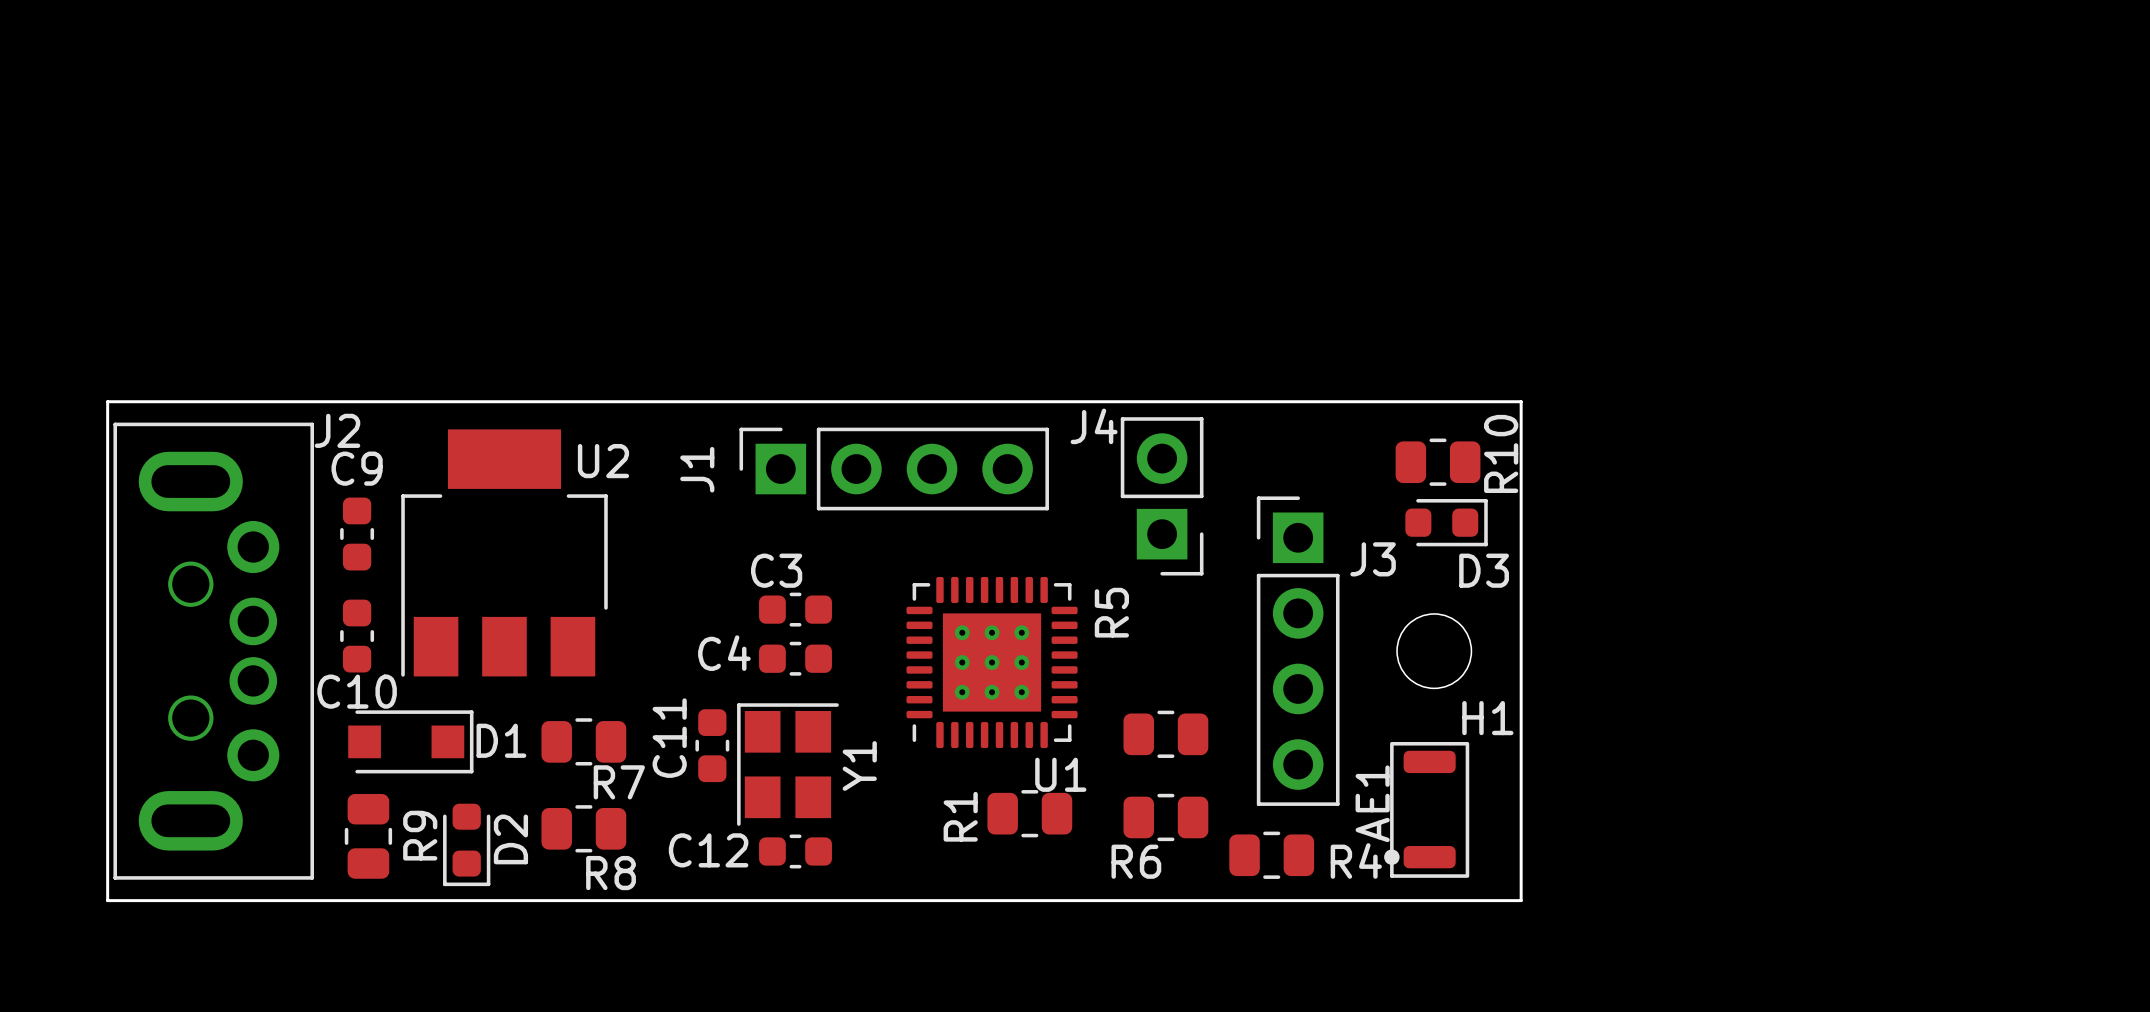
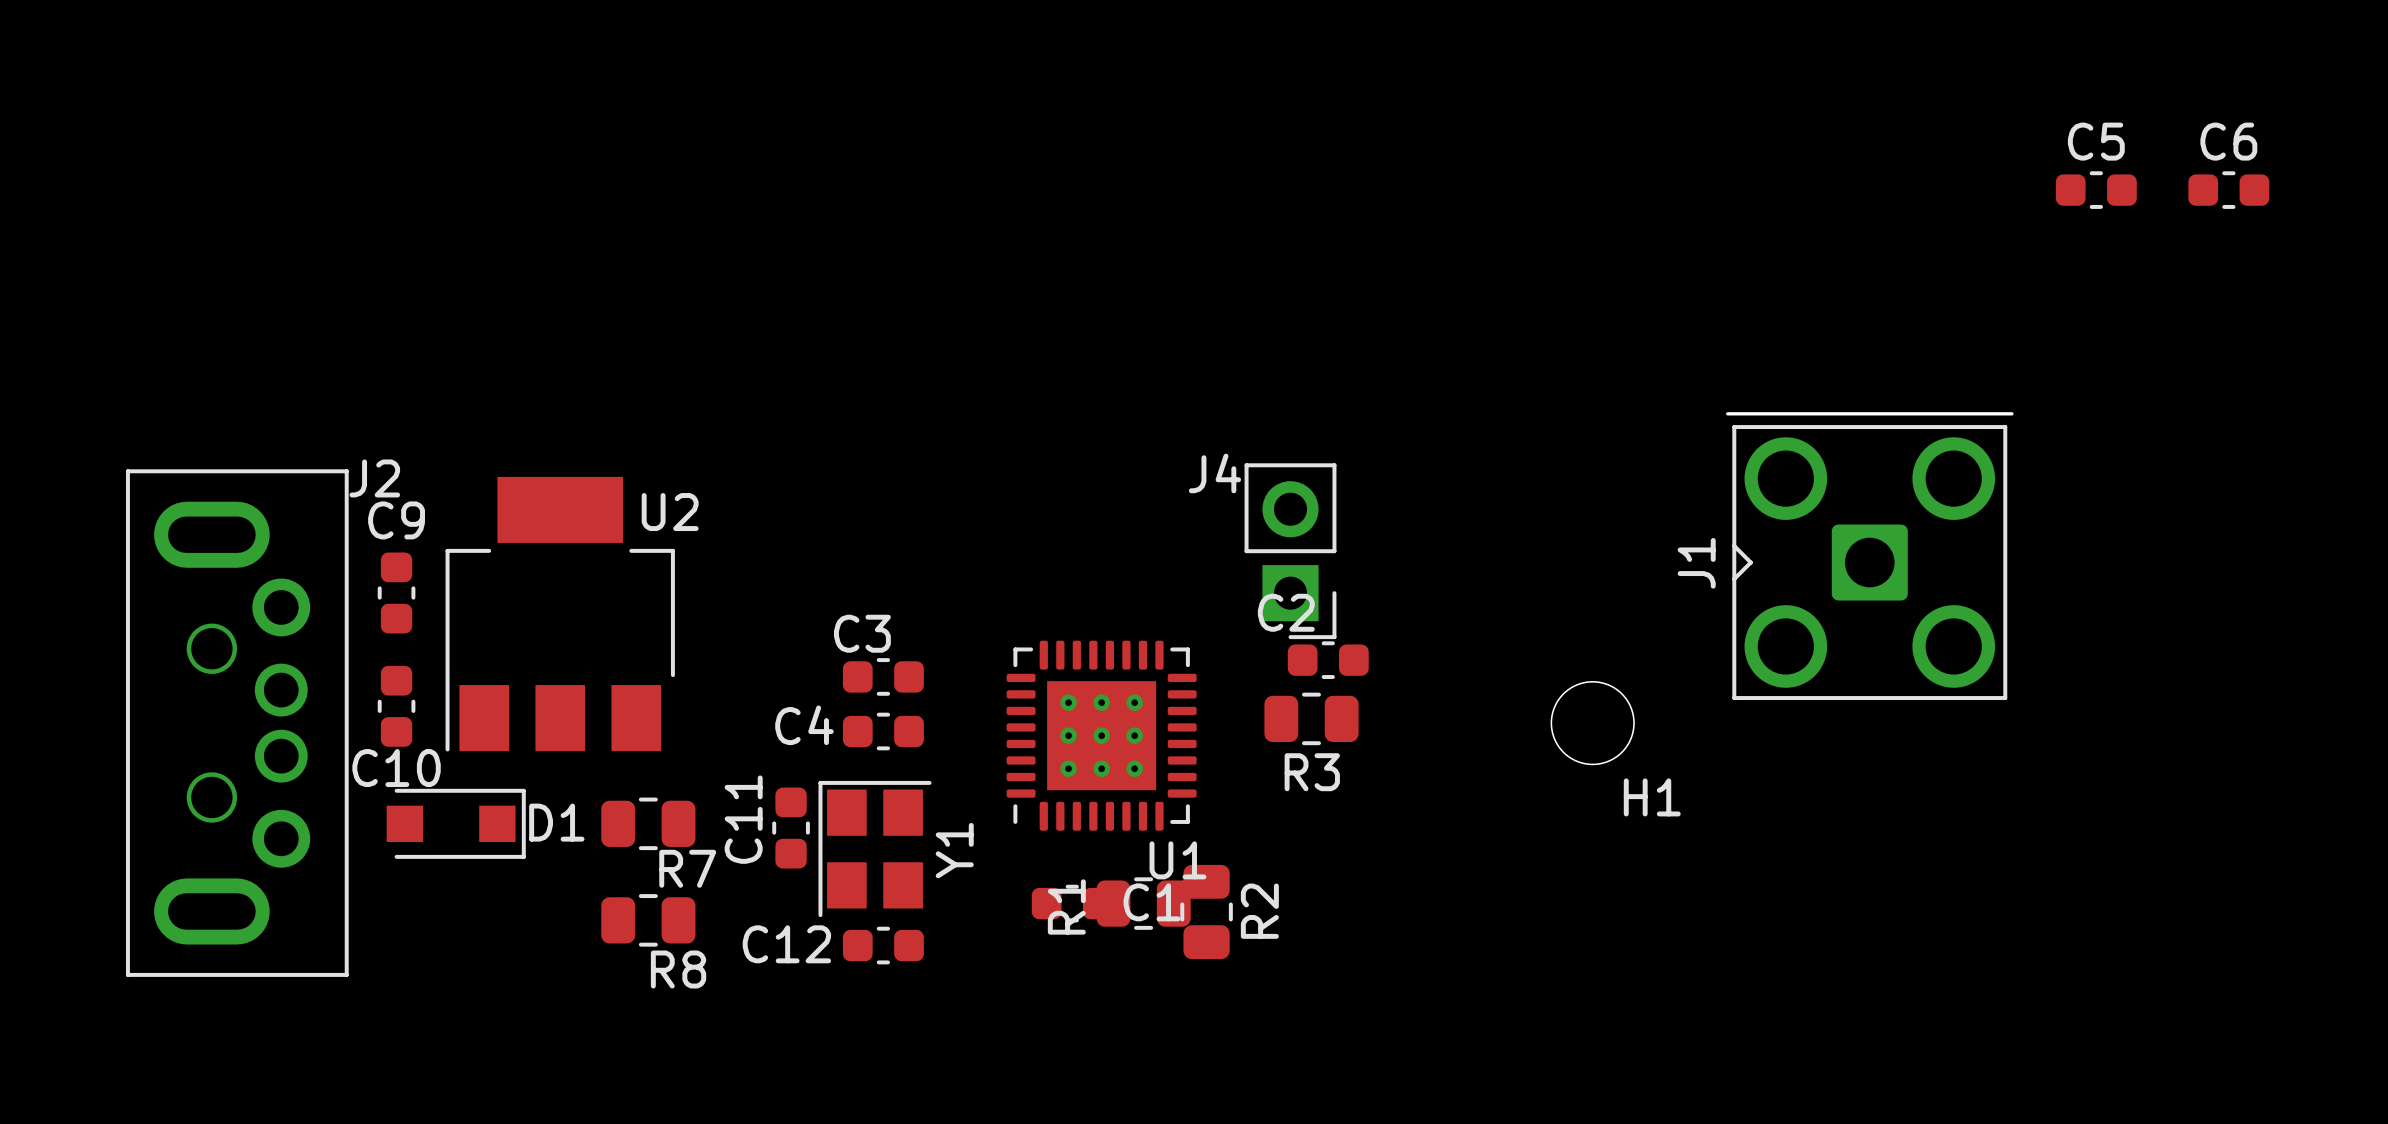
C5: none -> (2096, 190)
C6: none -> (2228, 190)
board edge: (107, 401) (107, 900) (1521, 900) (1521, 401) (107, 401) -> none
J1 footprint: [739, 427, 1049, 511] -> [1726, 412, 2014, 701]
R10: (1438, 462) -> none
D3: (1446, 522) -> none
C2: none -> (1328, 660)
R3: none -> (1311, 718)
J3: (1298, 651) -> none
R5: (1165, 734) -> none
AE1: (1426, 809) -> none
C1: none -> (1072, 903)
R6: (1165, 817) -> none
R2: none -> (1206, 911)
R9: (368, 836) -> none
D2: (466, 844) -> none
R4: (1271, 855) -> none

